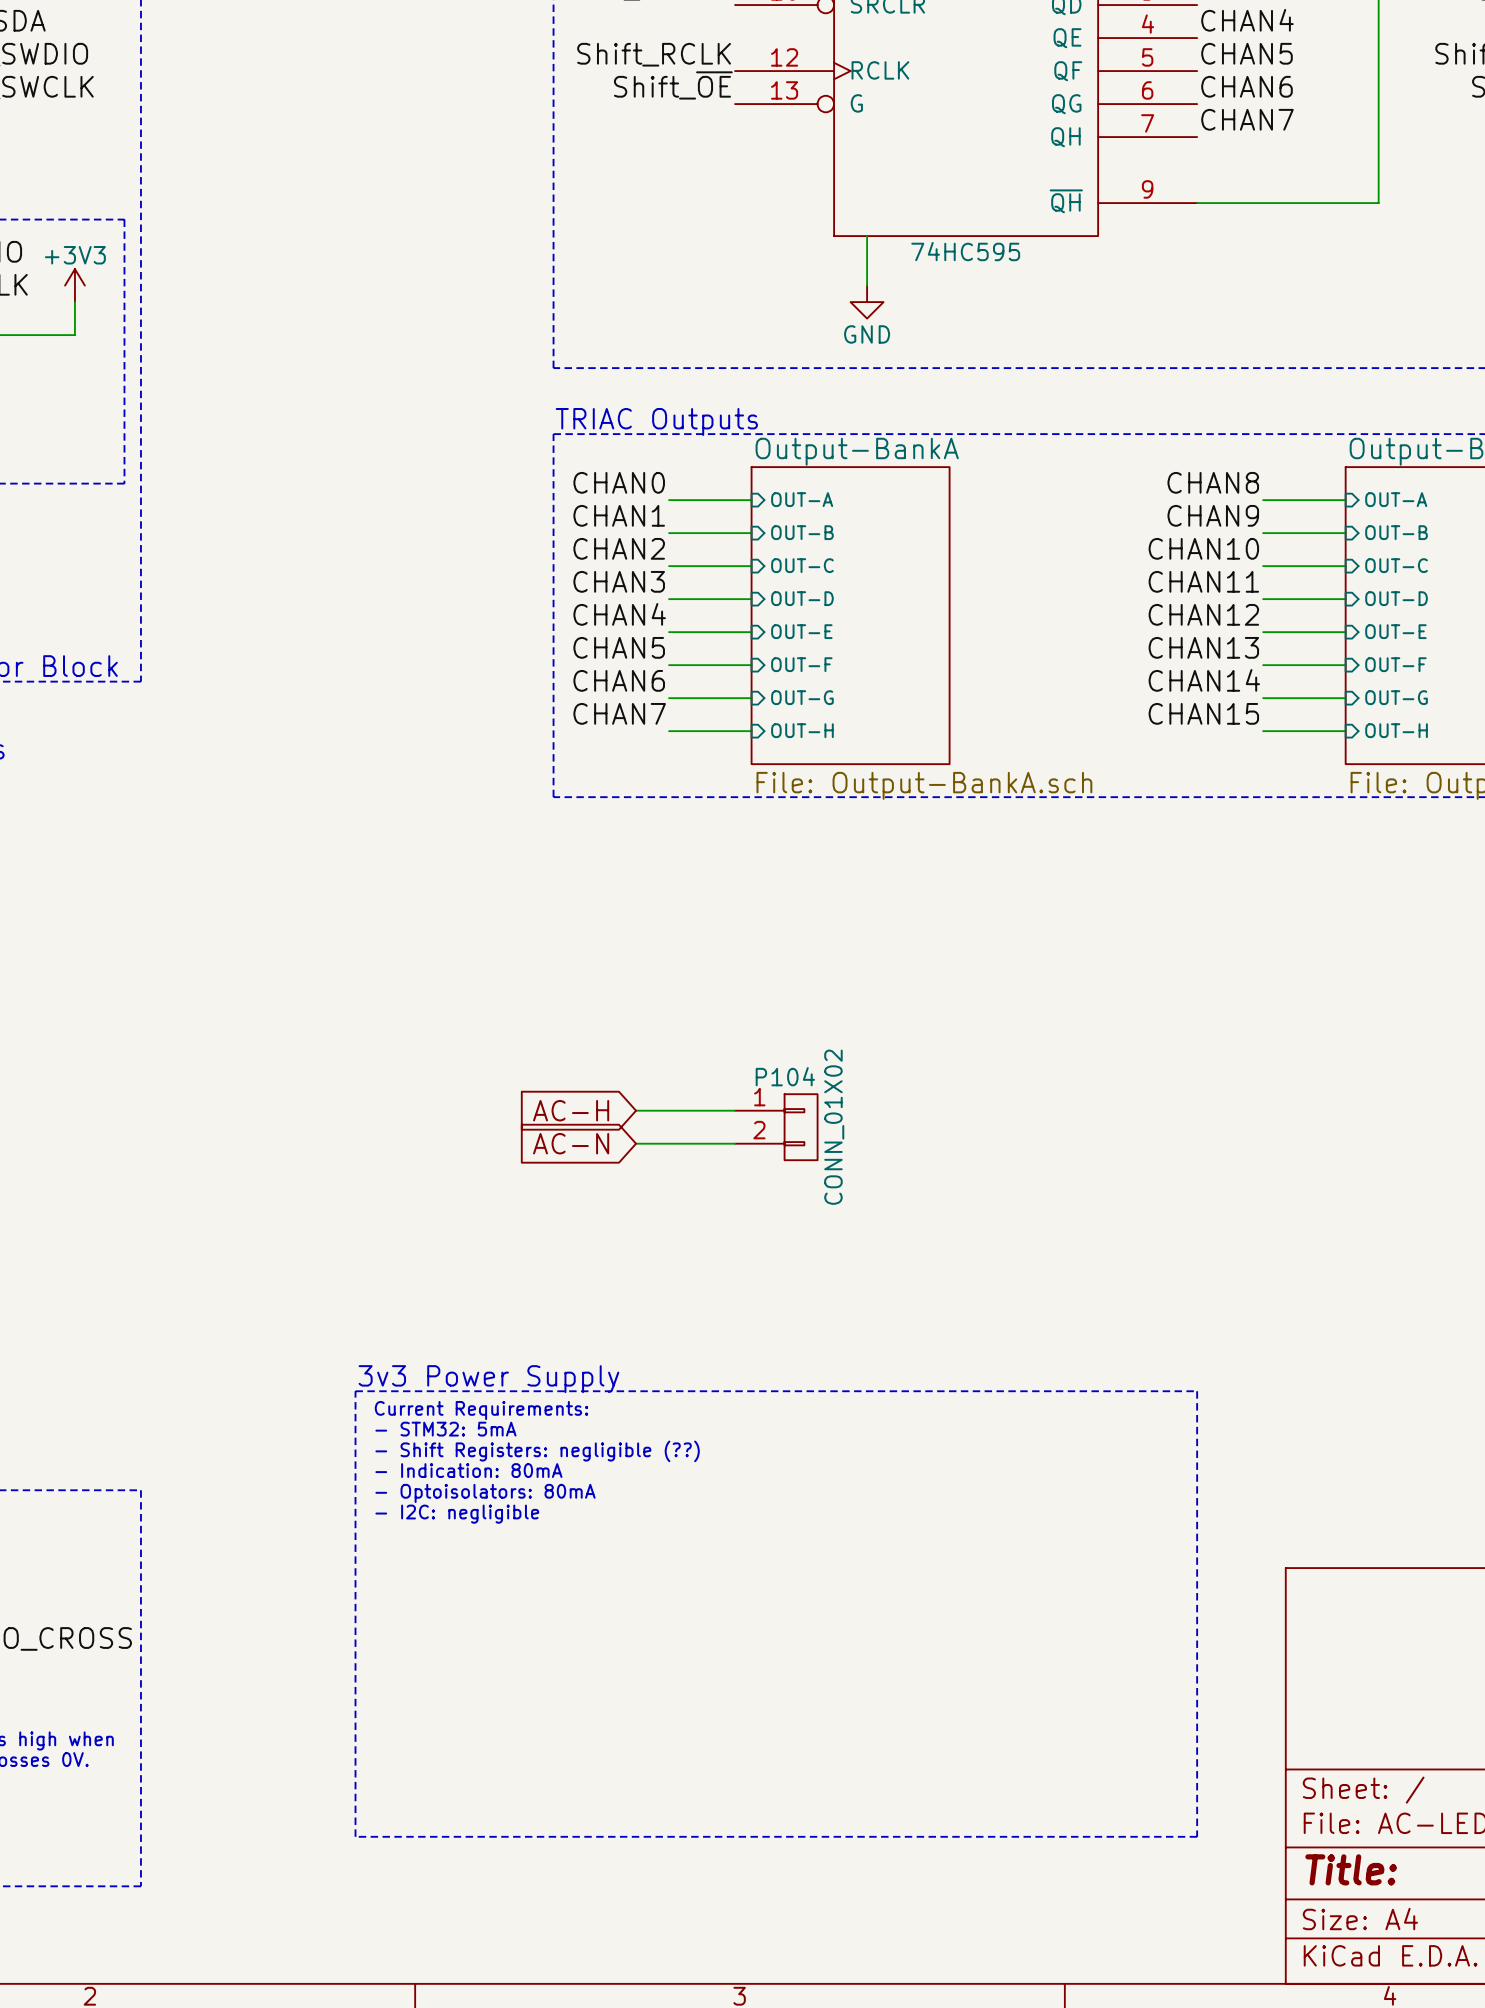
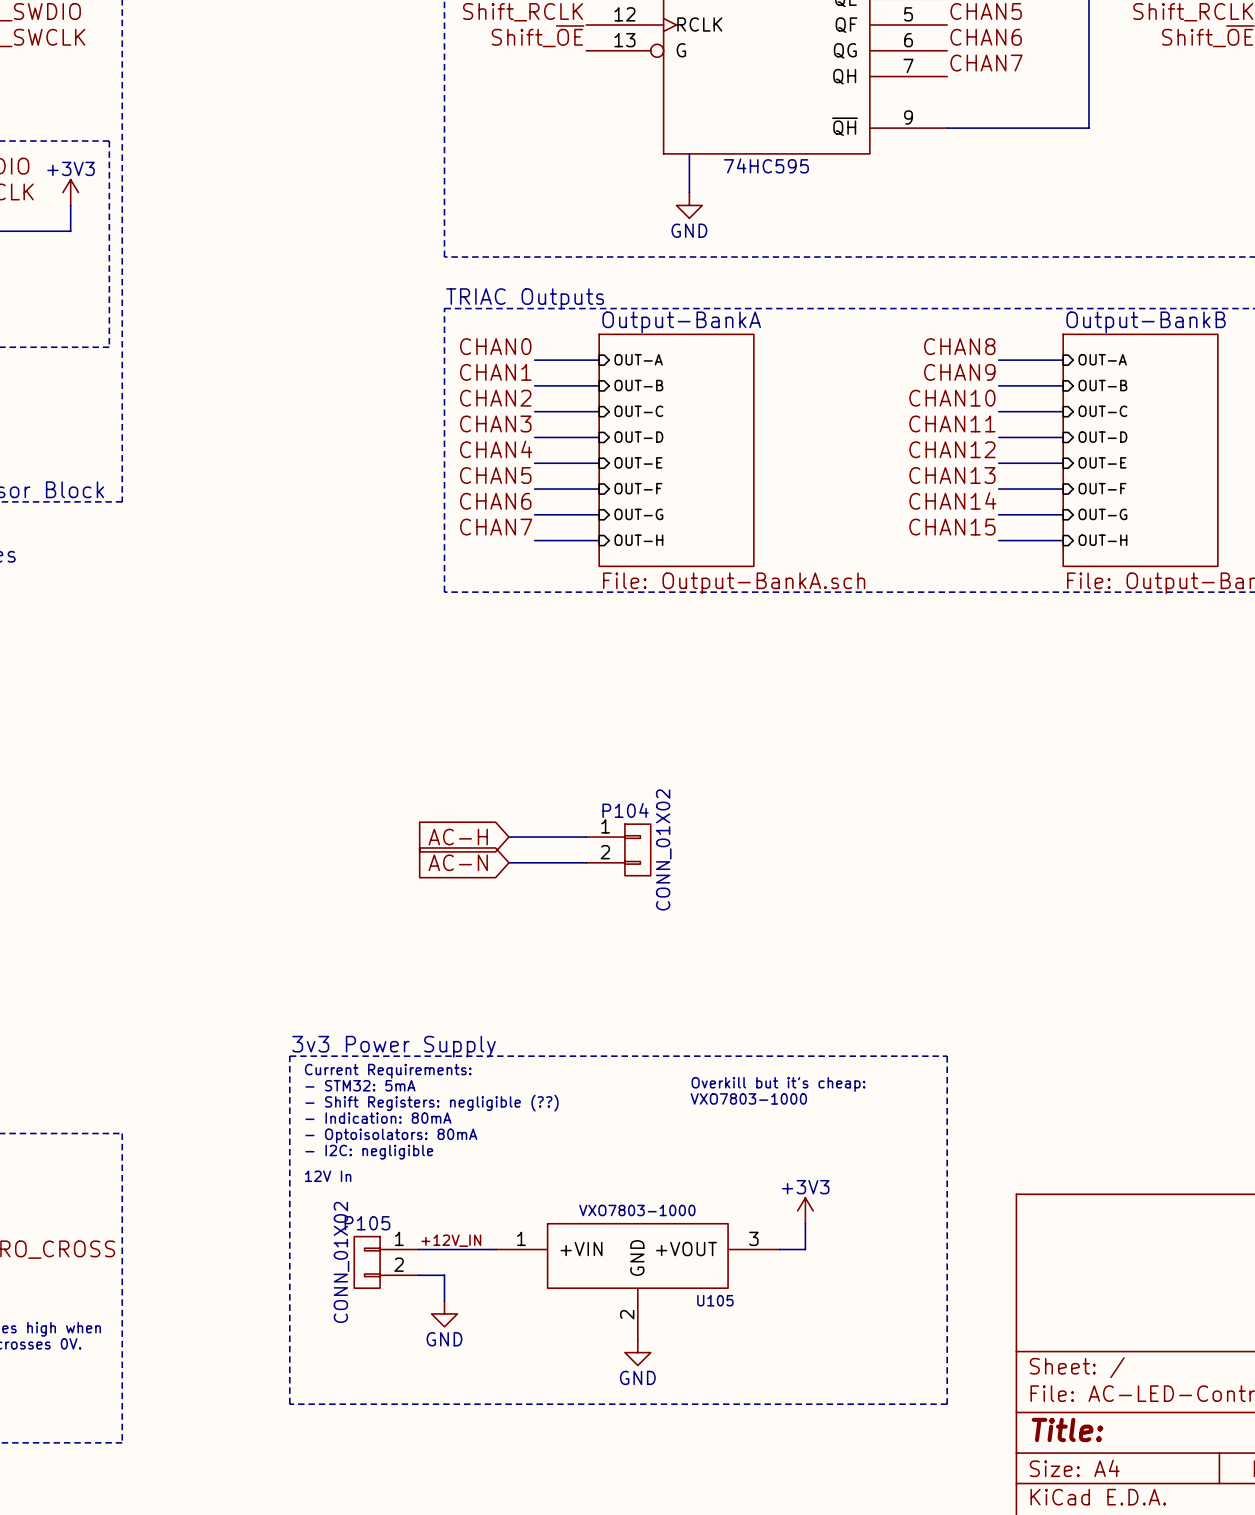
text: none -> Overkill but it's cheap: (778, 1084)
text: none -> VXO7803-1000 (748, 1098)
text: none -> 12V In (328, 1176)
power symbol: none -> +3V3 (805, 1210)
wire: none -> (805, 1223) (805, 1249) (779, 1249)
label: none -> +12V_IN (451, 1240)
wire: none -> (418, 1249) (496, 1249)
P105: none -> CONN_01X02 (386, 1262)
wire: none -> (418, 1275) (444, 1275) (444, 1301)
U105: none -> VXO7803-1000 (637, 1281)
power symbol: none -> GND (444, 1313)
power symbol: none -> GND (637, 1352)

